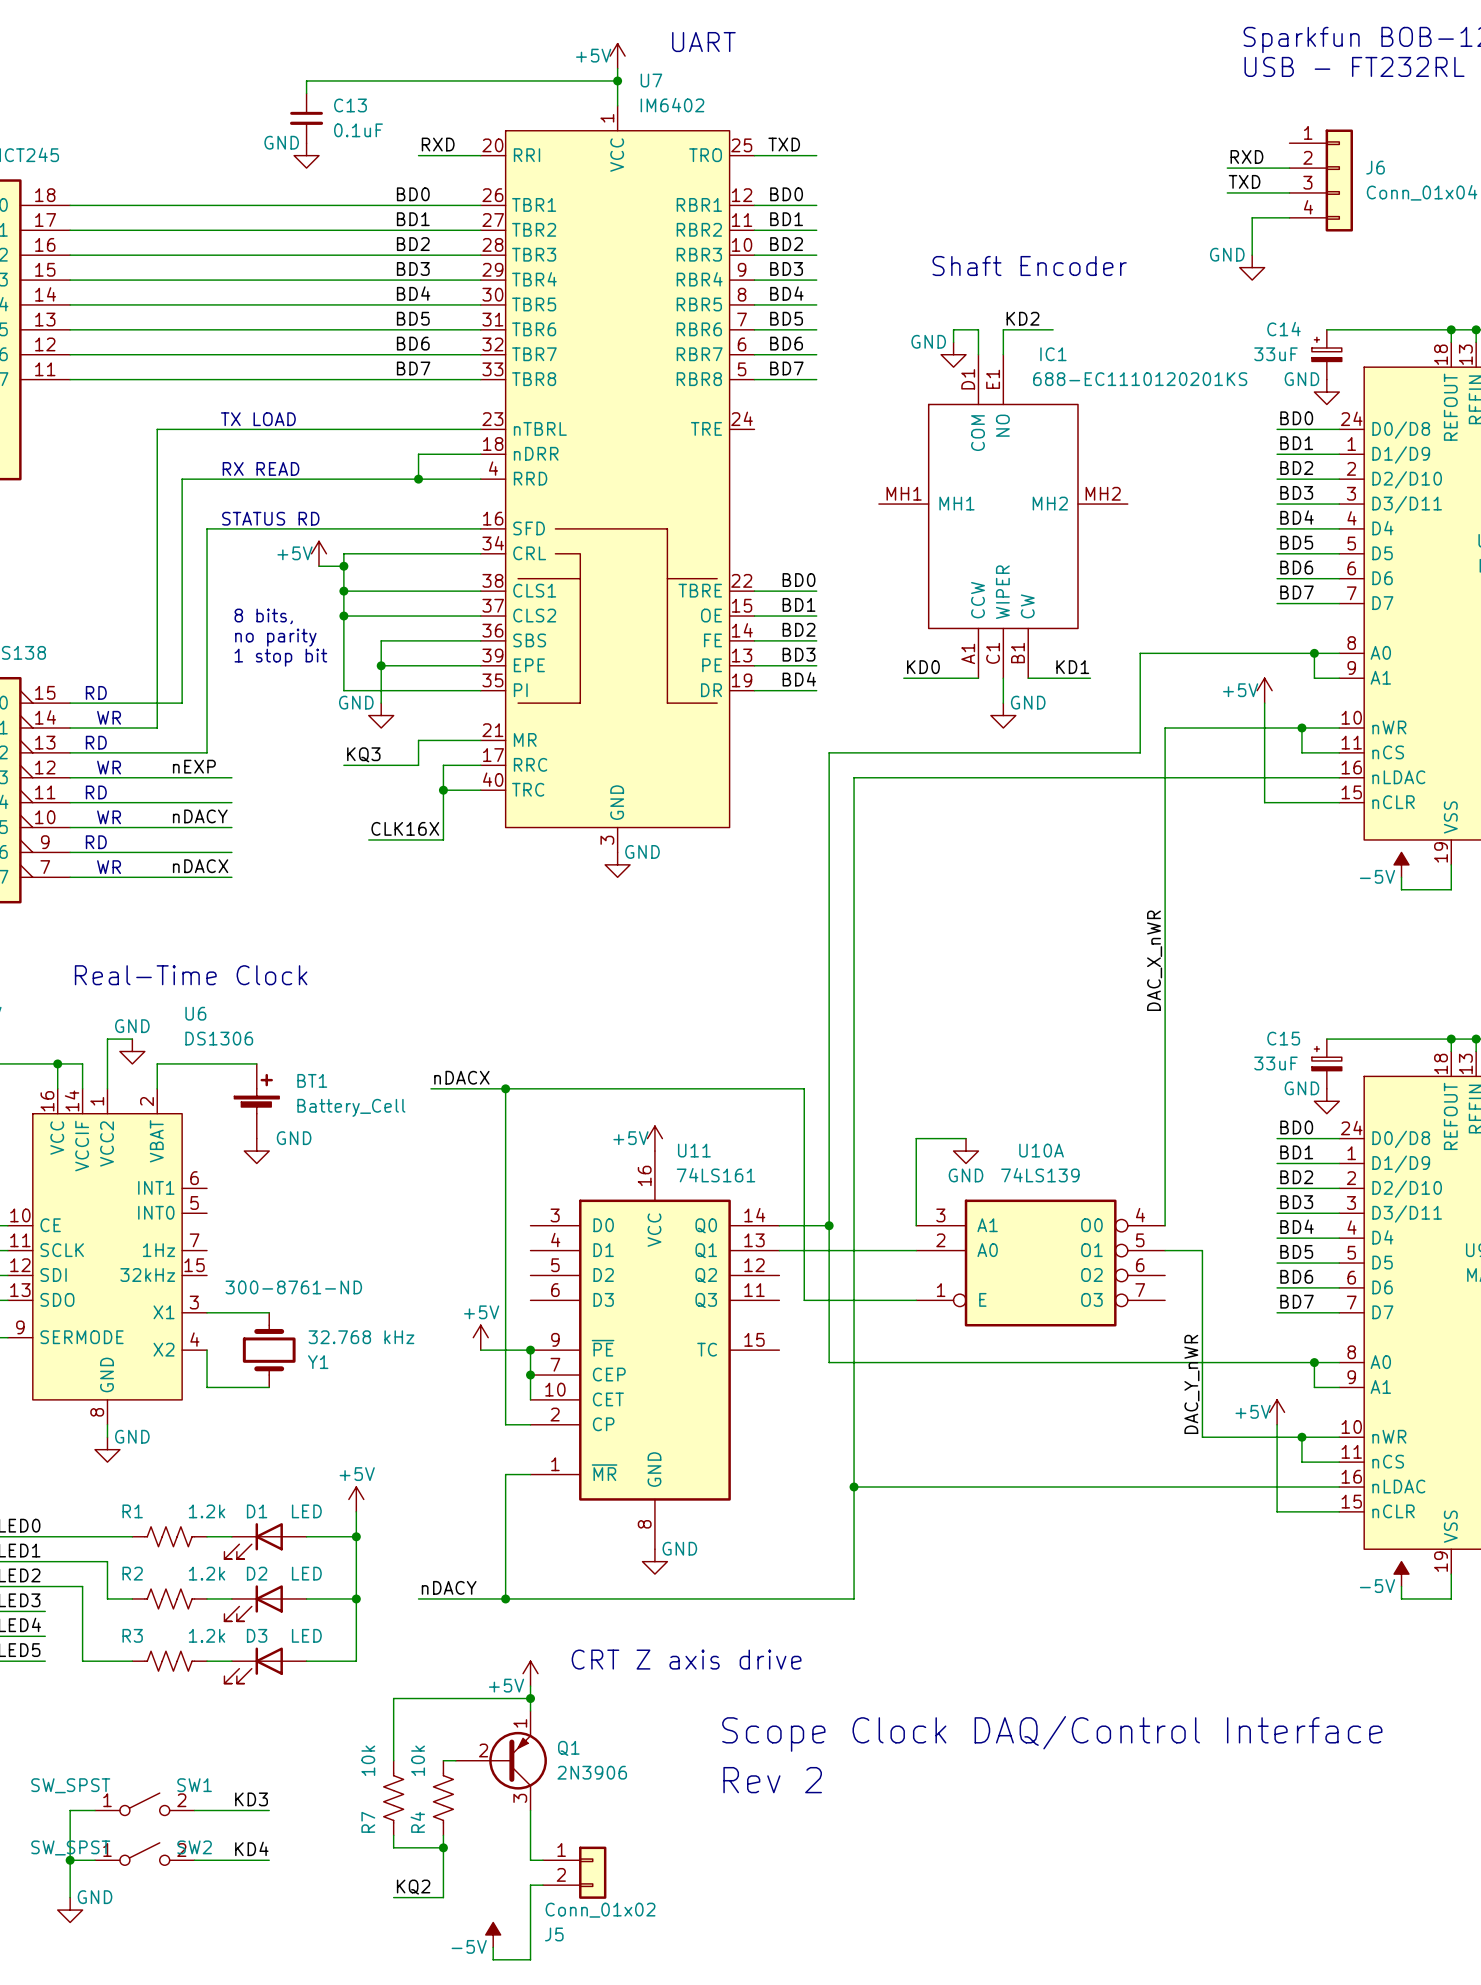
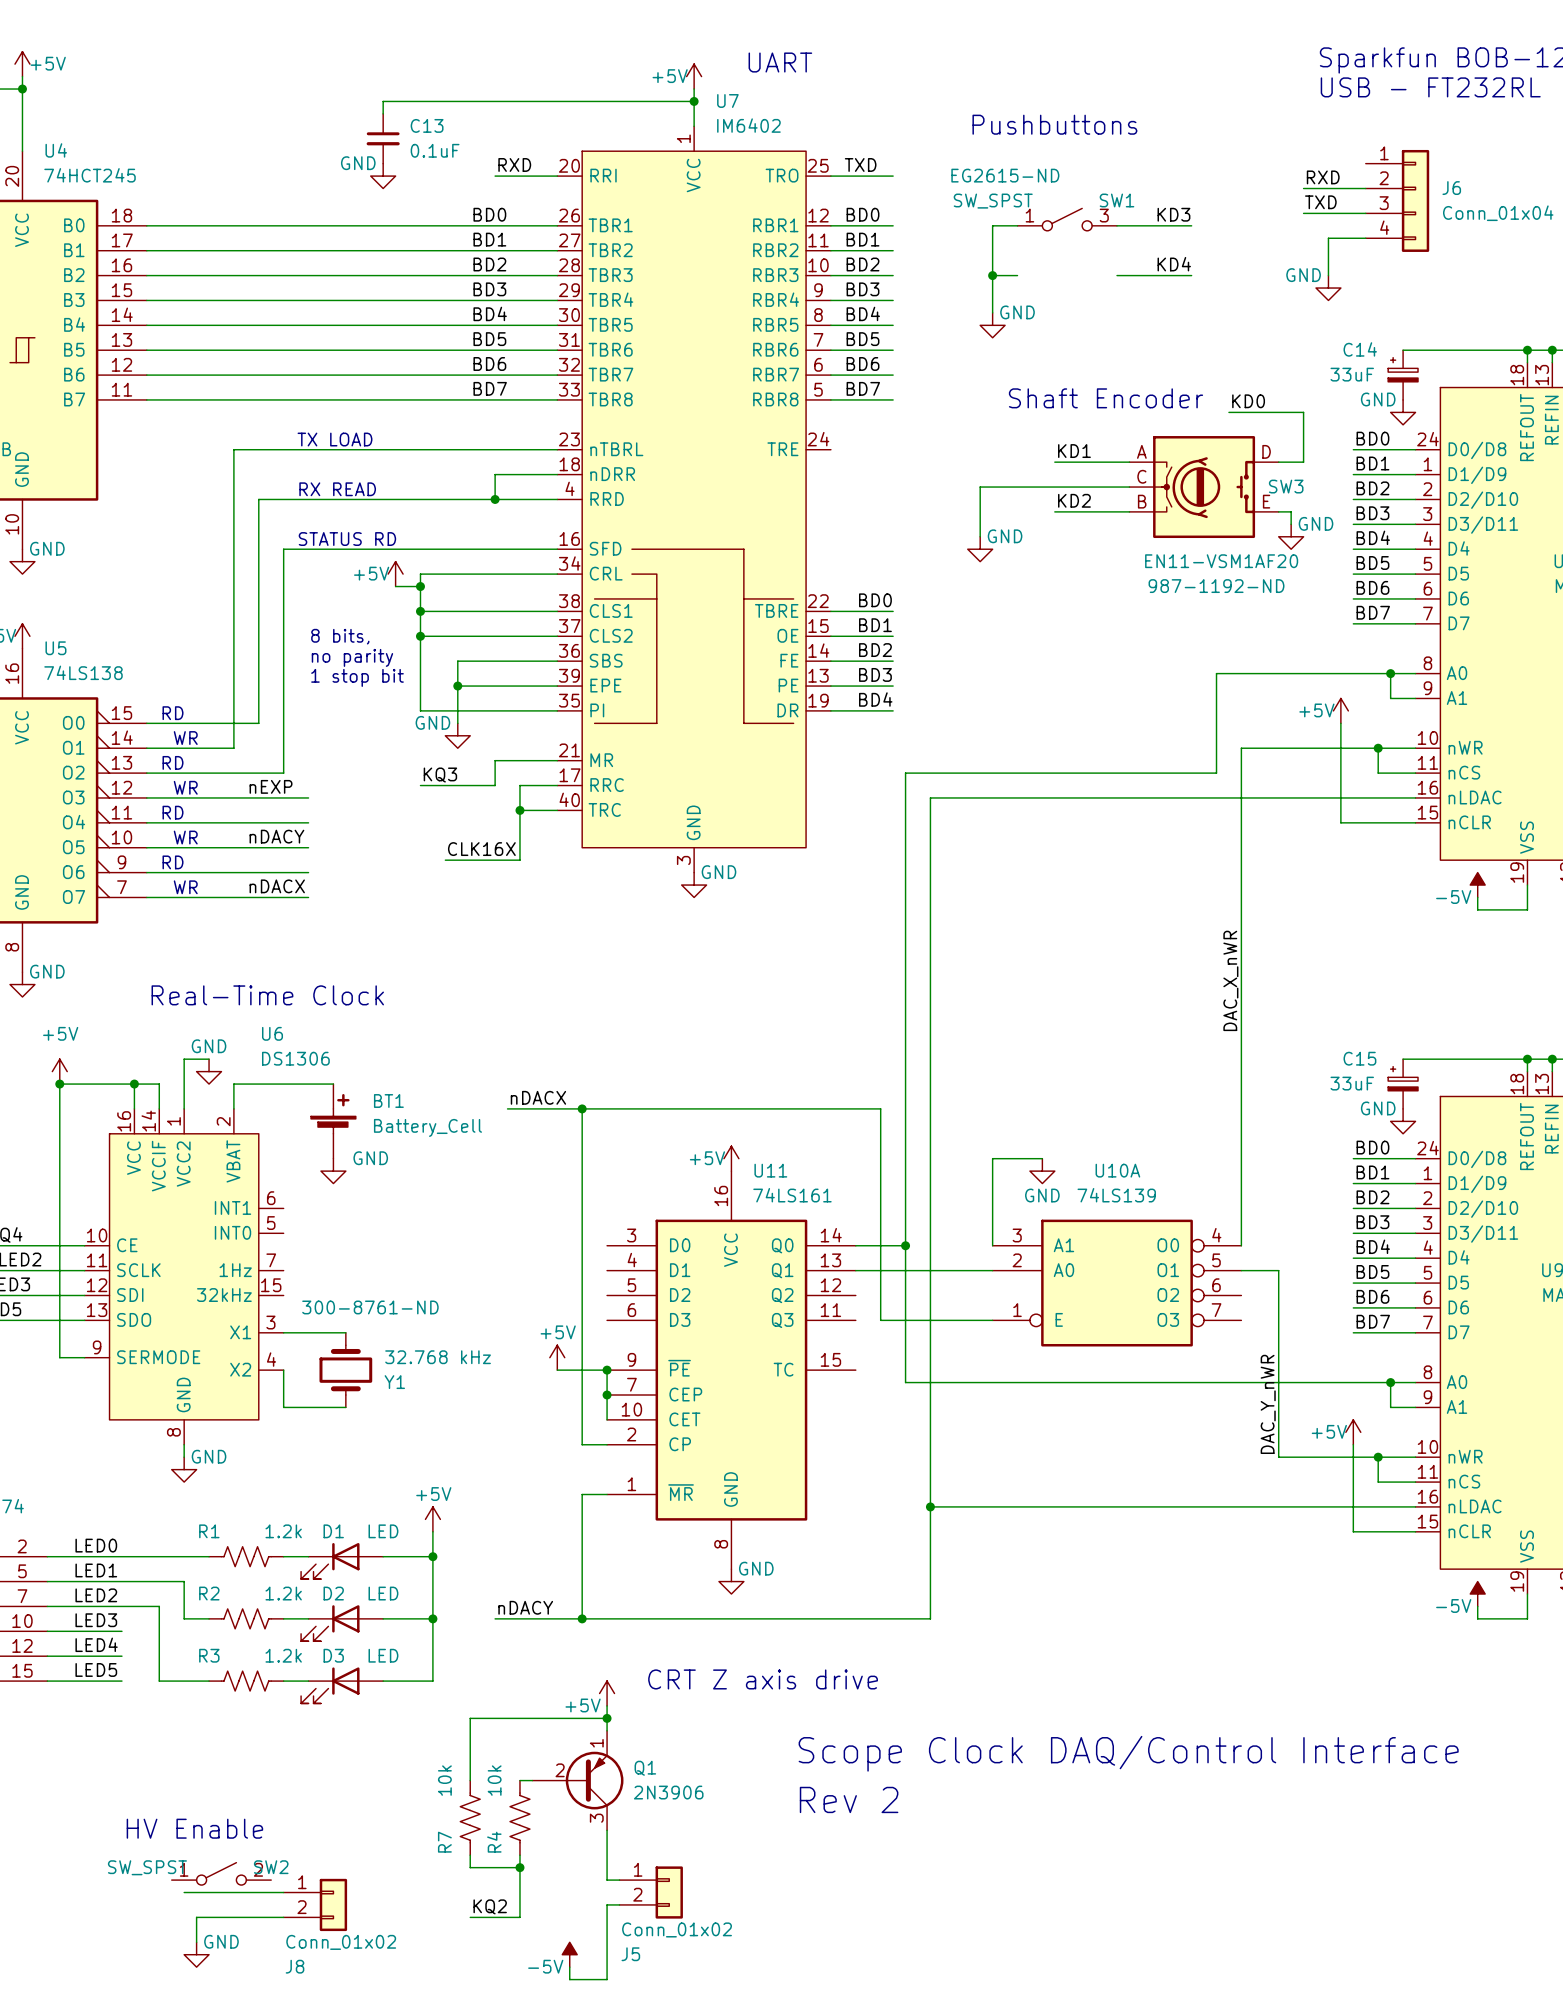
text: none -> Pushbuttons (1054, 124)
SW1 text: none -> EG2615-ND (1005, 175)
label: none -> KD3 (1173, 214)
wire: none -> (1017, 225) (992, 225) (992, 312)
wire: none -> (1117, 225) (1191, 225)
label: none -> KD4 (1174, 264)
wire: none -> (992, 275) (1017, 275)
junction: none -> (992, 275)
wire: none -> (1117, 275) (1191, 275)
text position: Shaft Encoder (1029, 266) -> Shaft Encoder (1105, 398)
label position: KD2 (1022, 318) -> KD2 (1074, 500)
wire: (1053, 329) (1003, 329) (1003, 354) -> none
power symbol text position: GND (928, 341) -> GND (1017, 312)
wire: (953, 342) (953, 329) (978, 329) (978, 354) -> none
power symbol position: GND (953, 354) -> GND (992, 325)
label: none -> KD0 (1248, 401)
wire: none -> (1228, 412) (1303, 412) (1303, 462) (1278, 462)
label: none -> KD1 (1074, 451)
wire: none -> (1054, 462) (1129, 462)
wire: none -> (1129, 487) (980, 487) (980, 536)
SW3: none -> EN11-VSM1AF20 (1204, 487)
wire: none -> (1278, 511) (1291, 511) (1291, 524)
IC1: (1003, 516) -> none
power symbol: none -> GND (1291, 536)
power symbol: none -> GND (980, 549)
label: KD0 (923, 667) -> none
label: KD1 (1072, 667) -> none
wire: (903, 678) (978, 678) -> (1054, 511) (1129, 511)
wire: (1003, 678) (1003, 703) -> none
wire: (1028, 678) (1090, 678) -> none
power symbol: GND (1003, 715) -> none
label: KD3 (251, 1799) -> none
SW1 pin number: 2 (181, 1800) -> 3 (1104, 215)
SW1 position: (144, 1804) -> (1067, 219)
text: none -> HV Enable (194, 1828)
wire: (95, 1810) (70, 1810) (70, 1897) -> none
wire: (194, 1810) (269, 1810) -> none
label: KD4 (251, 1848) -> none
wire: (70, 1860) (95, 1860) -> none
junction: (70, 1860) -> none
wire: (194, 1860) (269, 1860) -> none
wire: none -> (184, 1892) (283, 1892)
J8: none -> Conn_01x02 (315, 1904)
wire: none -> (283, 1917) (196, 1917) (196, 1942)
power symbol position: GND (70, 1910) -> GND (196, 1954)

